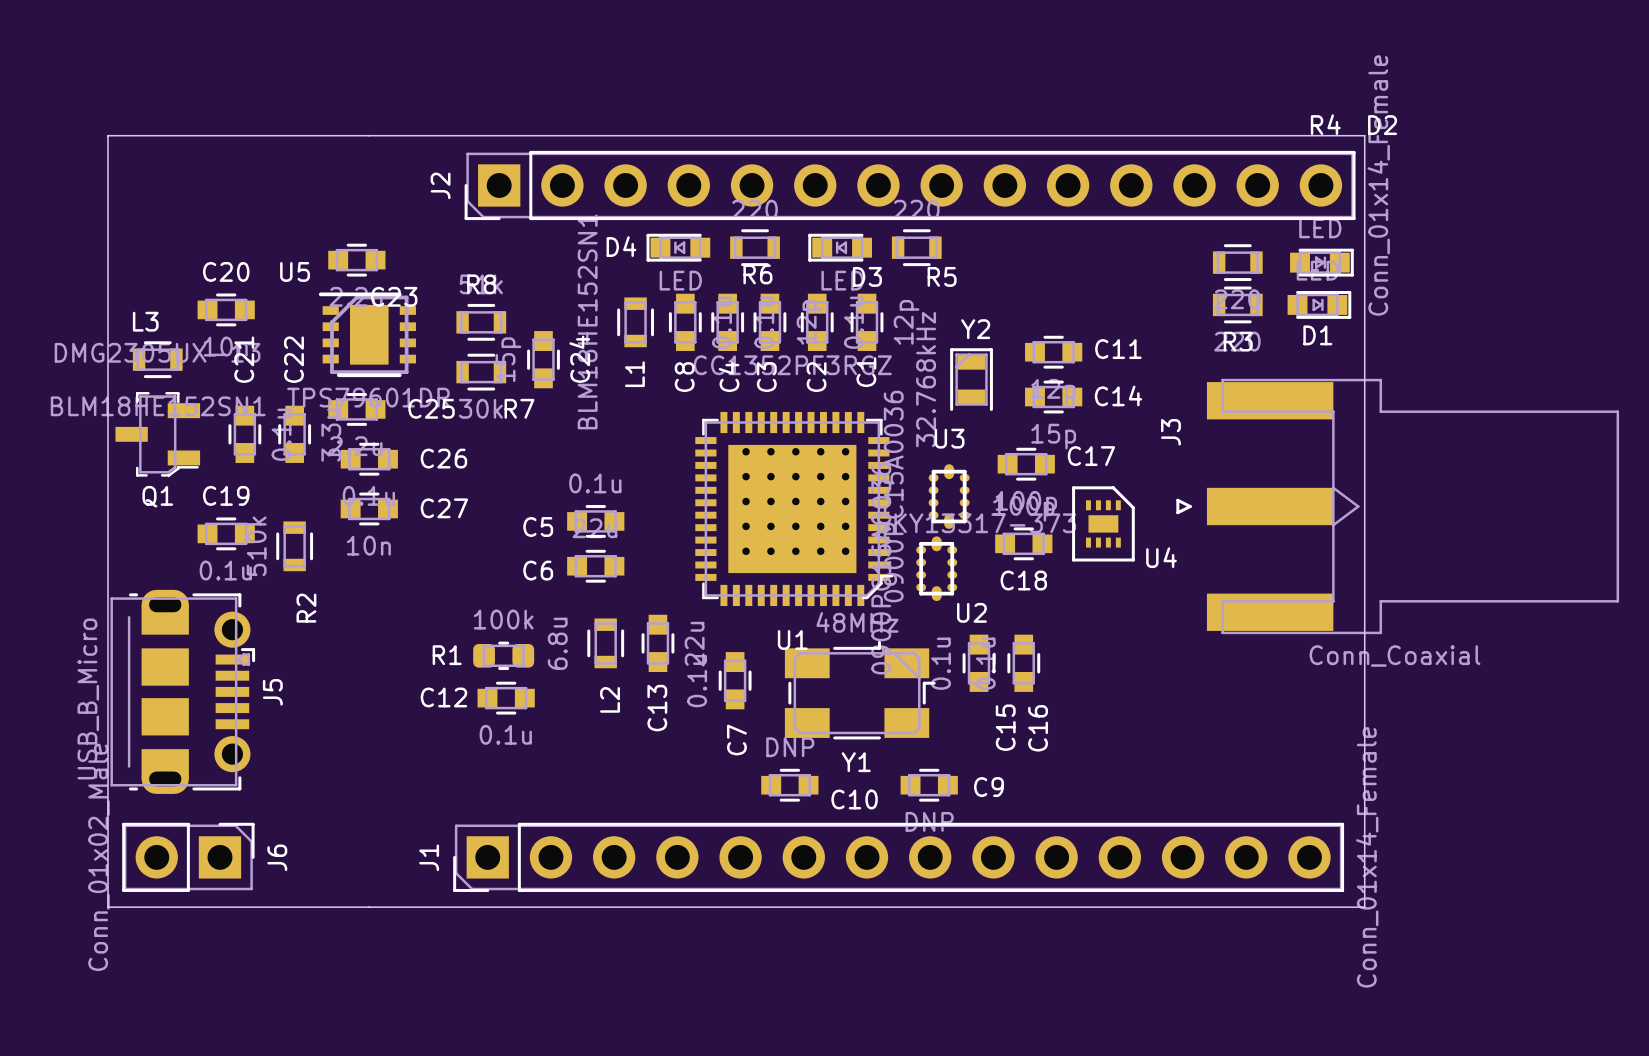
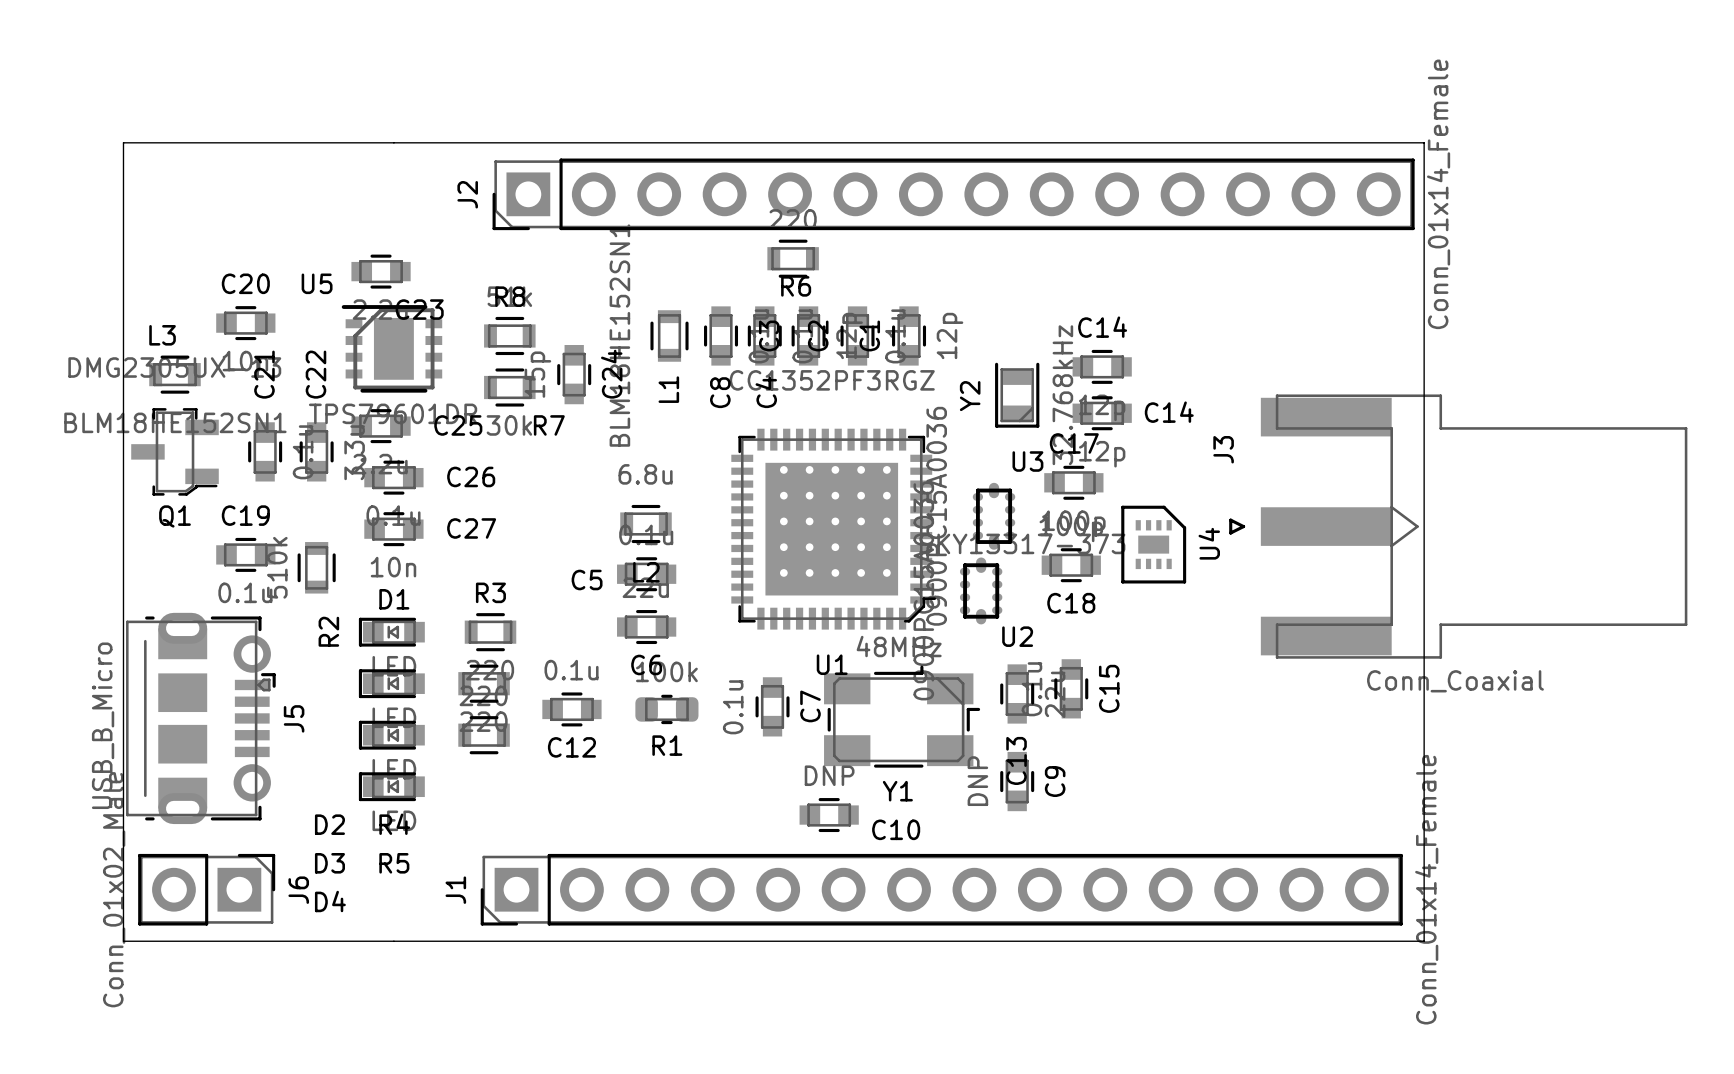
R4 name position: R4 (1325, 124) -> R4 (394, 824)
D4 name position: D4 (621, 246) -> D4 (330, 901)
D4 position: (678, 247) -> (391, 786)
D3 position: (840, 247) -> (391, 735)
R5 position: (916, 247) -> (484, 735)
R4 position: (1237, 262) -> (484, 683)
D2 rotation: 0° (1321, 262) -> 180° (391, 683)
D2 position: (1321, 262) -> (391, 683)
D3 name position: D3 (867, 276) -> D3 (329, 863)
R5 name position: R5 (942, 276) -> R5 (394, 863)
R3 position: (1237, 304) -> (490, 632)
D1 rotation: 0° (1319, 304) -> 180° (391, 632)
D1 position: (1319, 304) -> (391, 632)
Y2 name position: Y2 (975, 329) -> Y2 (970, 396)
R3 name position: R3 (1238, 341) -> R3 (490, 592)
C11 name: C11 (1118, 349) -> C14 (1102, 327)
C1 name position: C1 (866, 372) -> C1 (869, 335)
C3 name position: C3 (766, 377) -> C3 (769, 335)
C2 name position: C2 (816, 377) -> C2 (818, 335)
Y2 rotation: 0° (971, 379) -> 180° (1017, 395)
C14 value: 15p (1053, 436) -> 12p (1102, 454)
U3 name position: U3 (949, 438) -> U3 (1027, 461)
C17 name position: C17 (1091, 456) -> C17 (1074, 443)
C5 position: (595, 521) -> (646, 574)
U4 name rotation: 0° (1161, 557) -> 90° counterclockwise (1209, 543)
C6 position: (595, 566) -> (646, 627)
C6 name position: C6 (538, 570) -> C6 (646, 664)
L2 rotation: 0° (605, 643) -> 90° clockwise (646, 524)
L2 position: (605, 643) -> (646, 524)
C13 position: (657, 643) -> (1017, 693)
R1 name position: R1 (447, 655) -> R1 (667, 745)
R1 position: (503, 655) -> (666, 709)
C15: 0.1u (979, 663) -> none
C12 name position: C12 (443, 697) -> C12 (571, 747)
C12 position: (506, 698) -> (571, 709)
C16 name: C16 (1038, 728) -> C15 (1109, 688)
C12 value position: 0.1u (505, 734) -> 0.1u (571, 670)
C7 name position: C7 (736, 740) -> C7 (810, 706)
C9 rotation: 0° (929, 785) -> 90° clockwise (1017, 781)
C9 position: (929, 785) -> (1017, 781)

